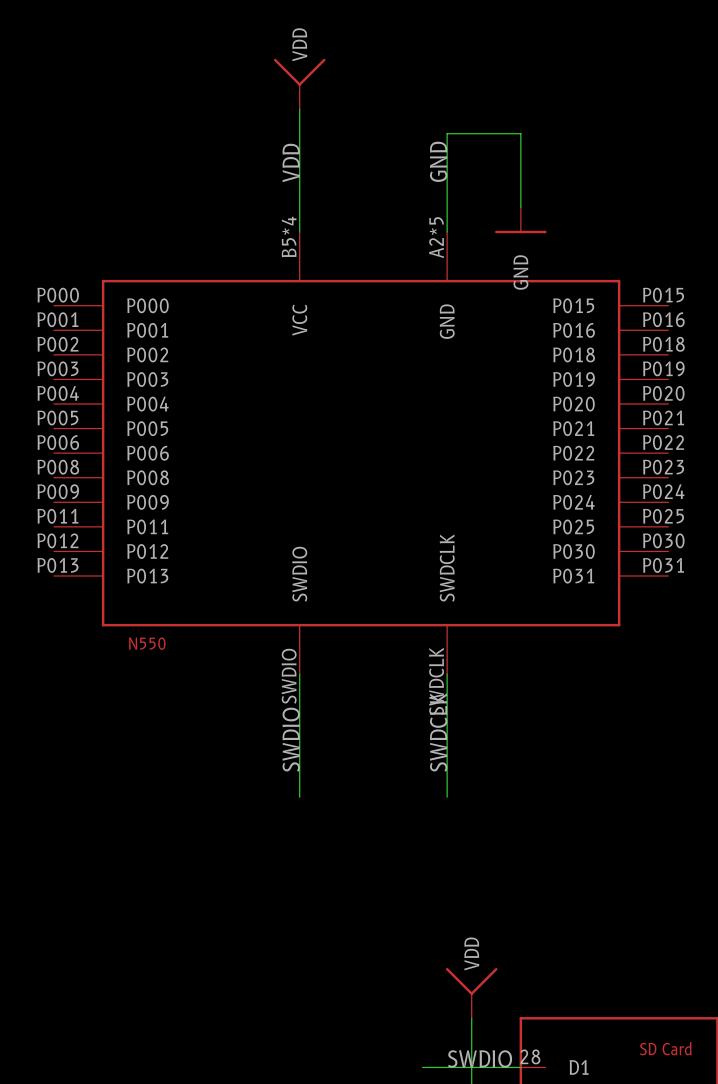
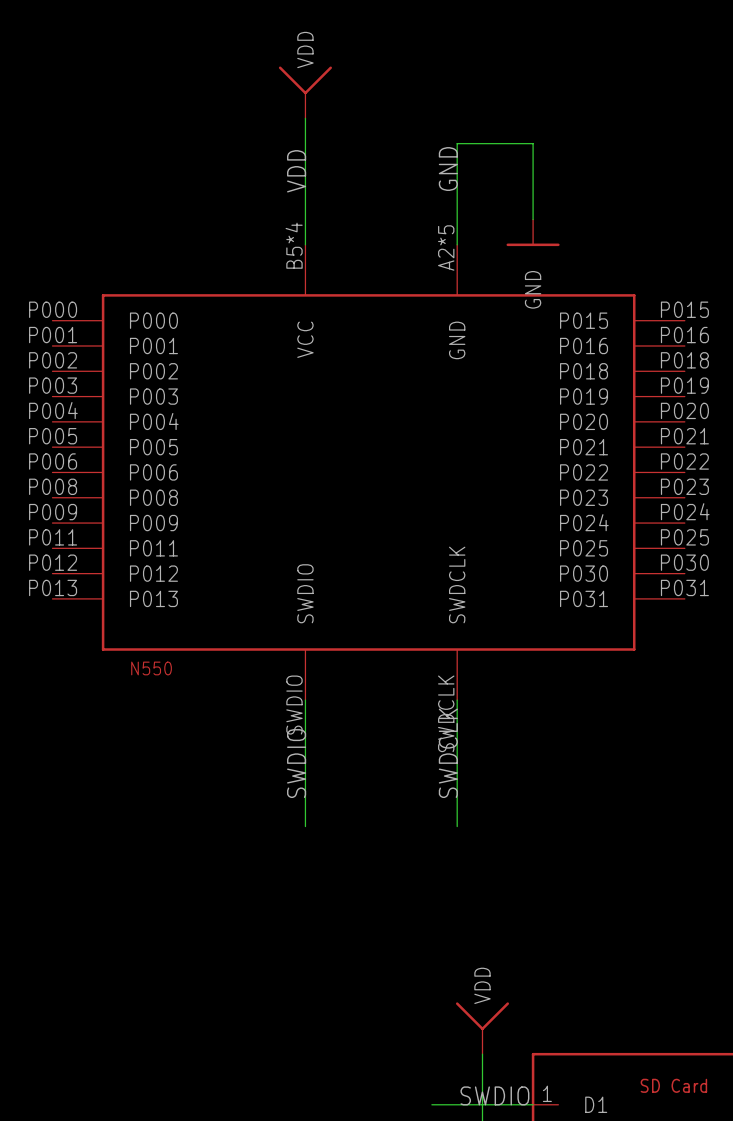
part pin number: 28 (530, 1056) -> 1 (547, 1093)

